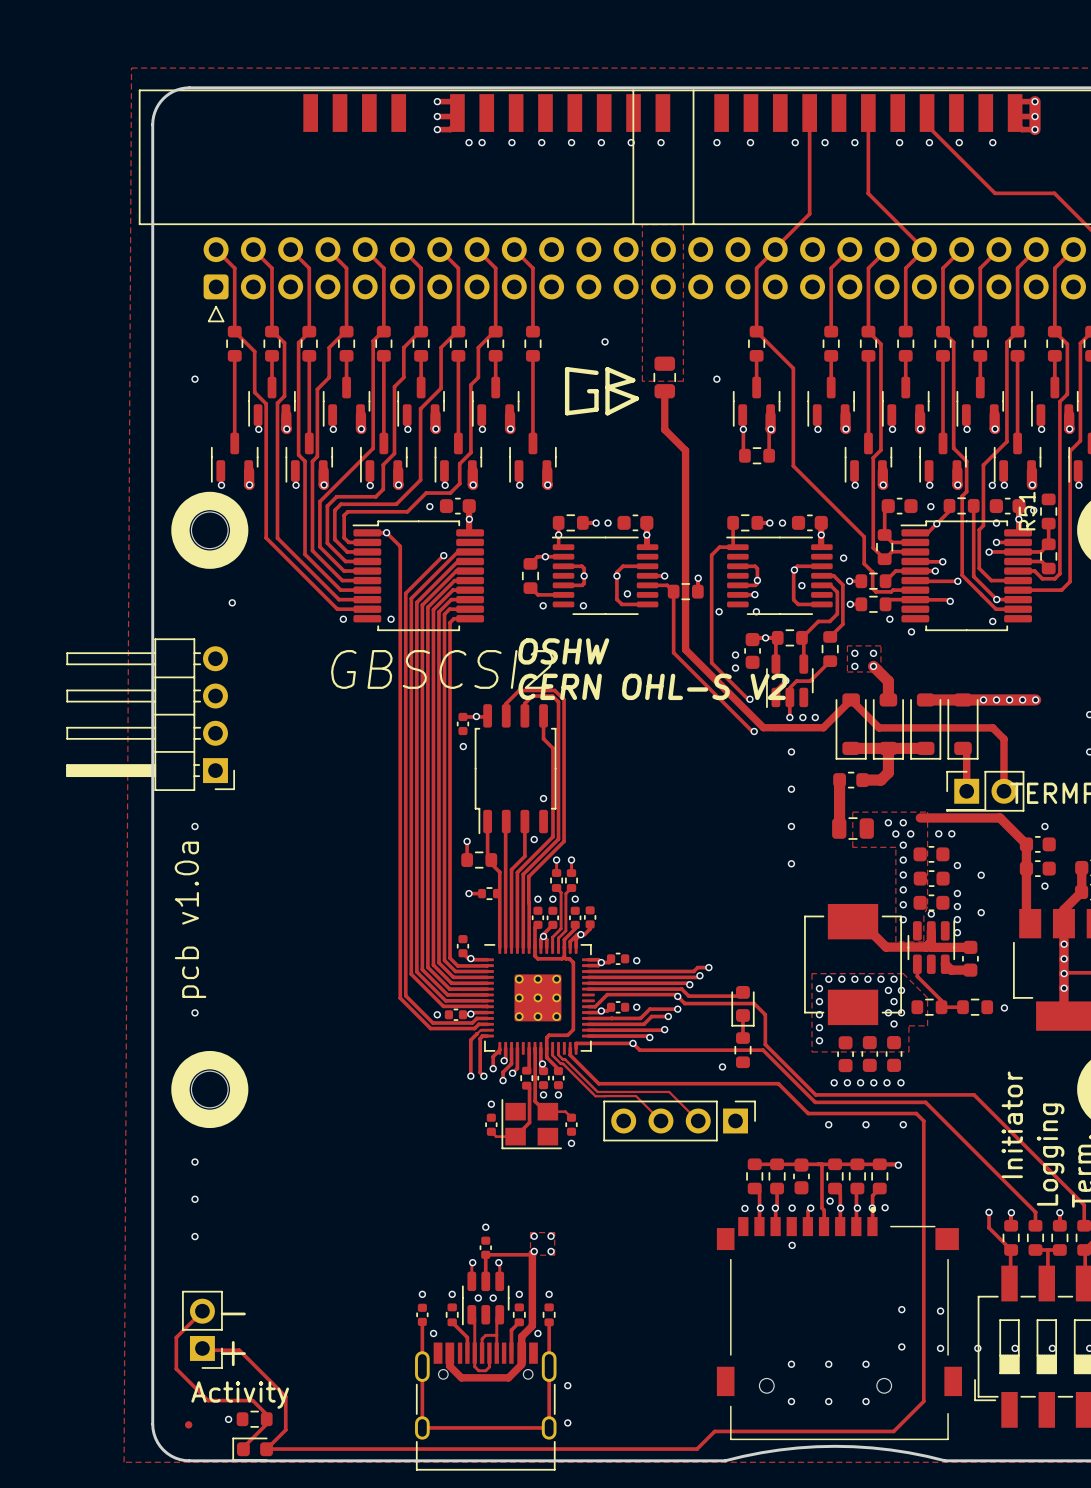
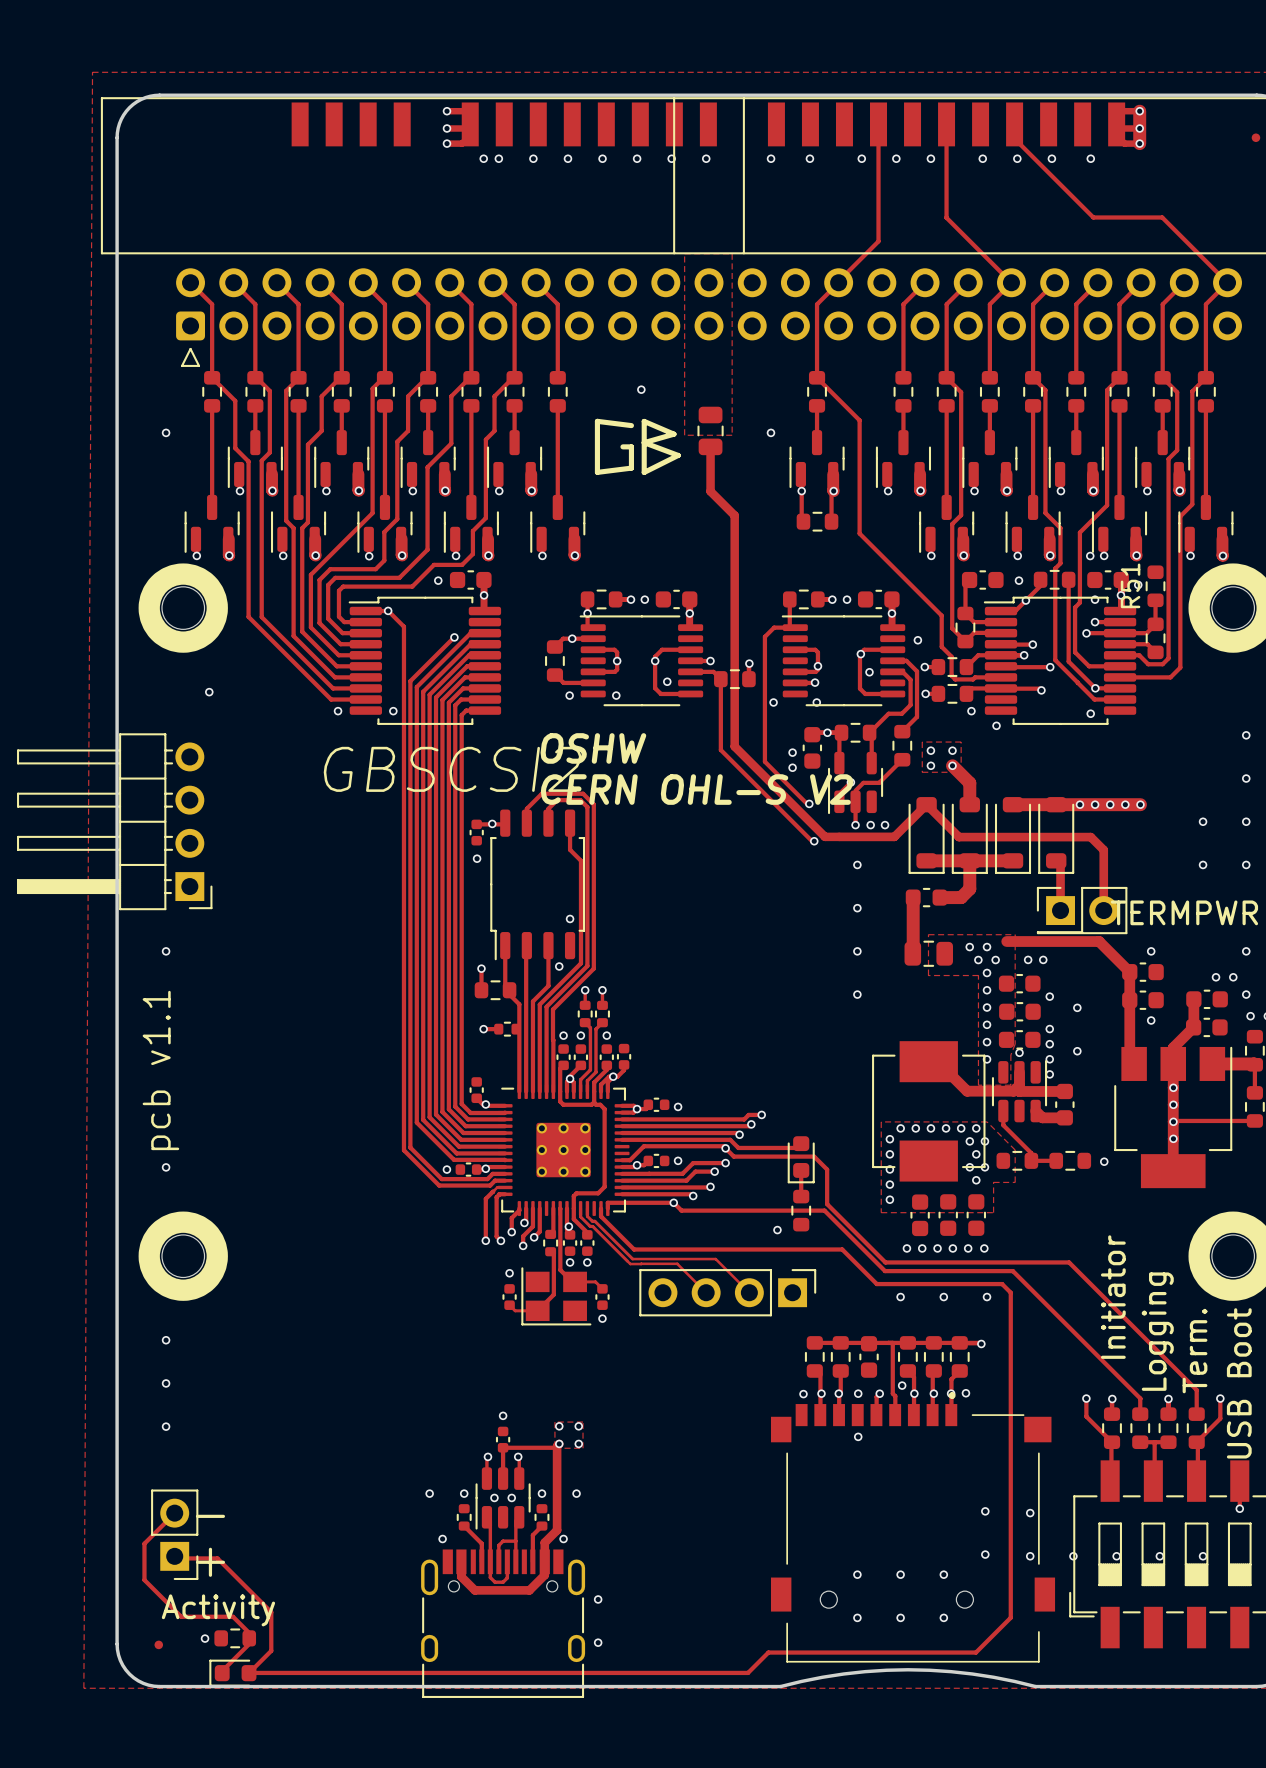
text: pcb v1.0a (190, 919) -> pcb v1.1 (160, 1070)
part: (422, 1314) -> none
part: (549, 1314) -> none
track: (422, 1321) (422, 1427) (549, 1427) (549, 1322) -> none

